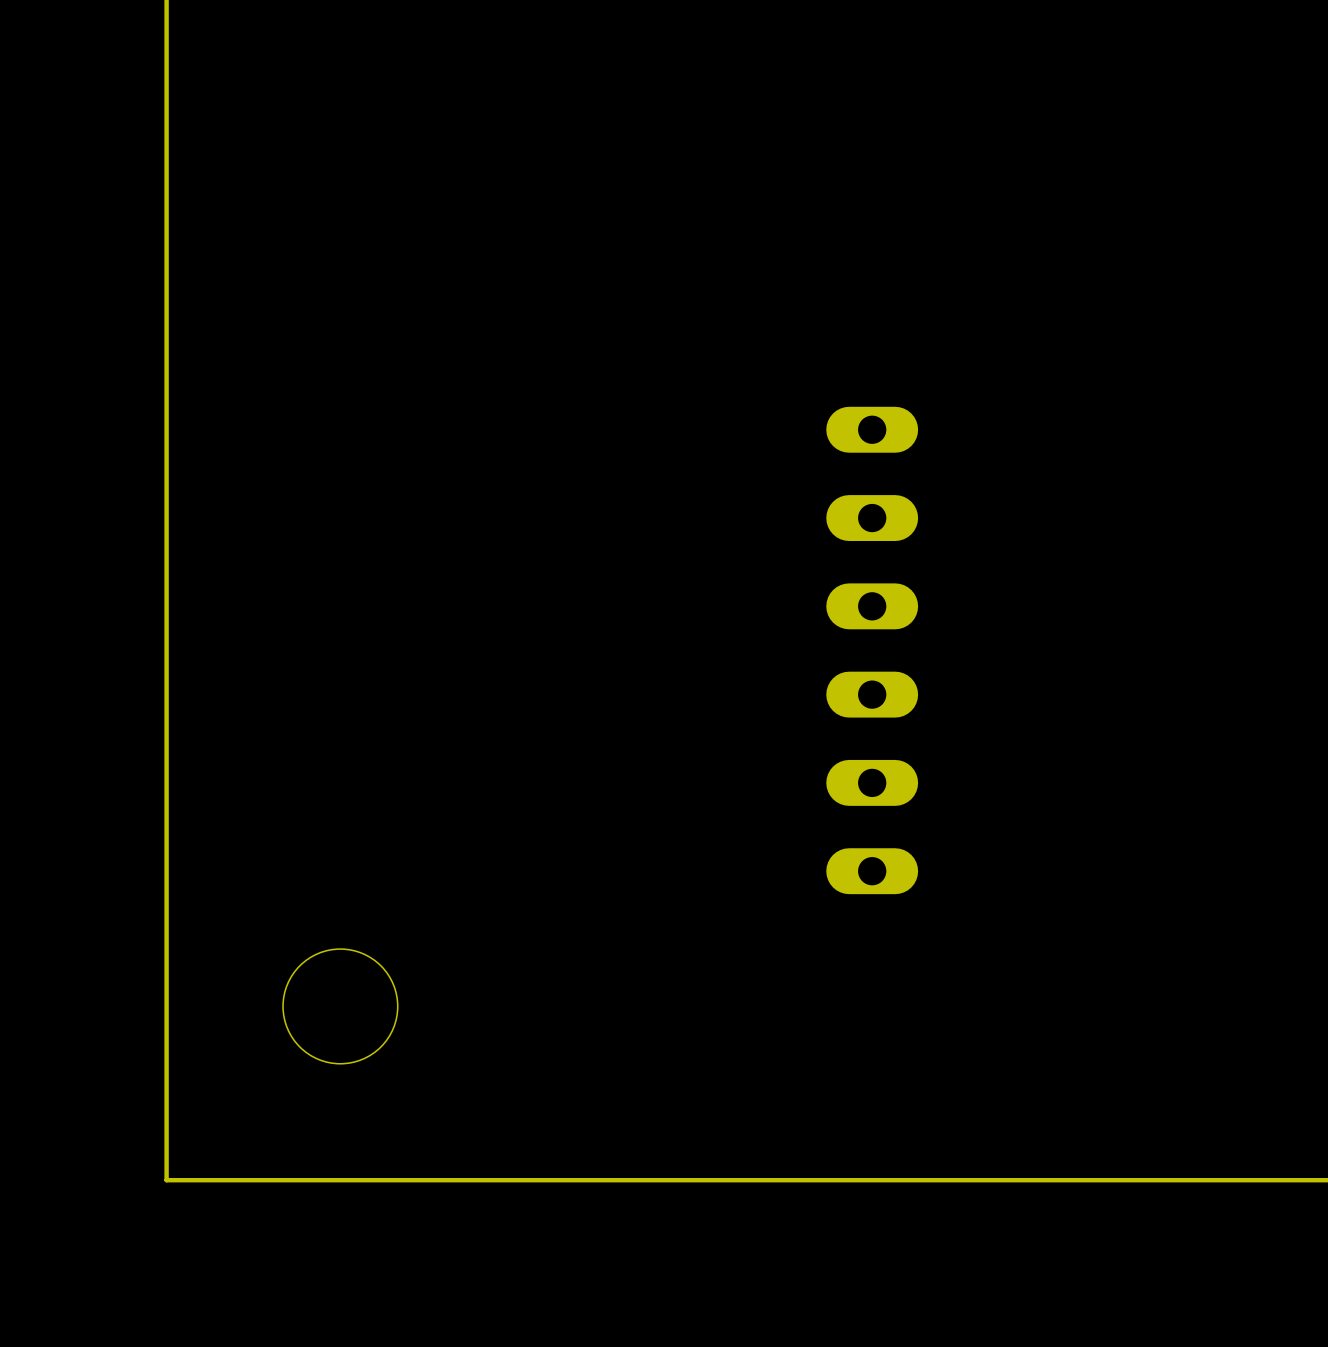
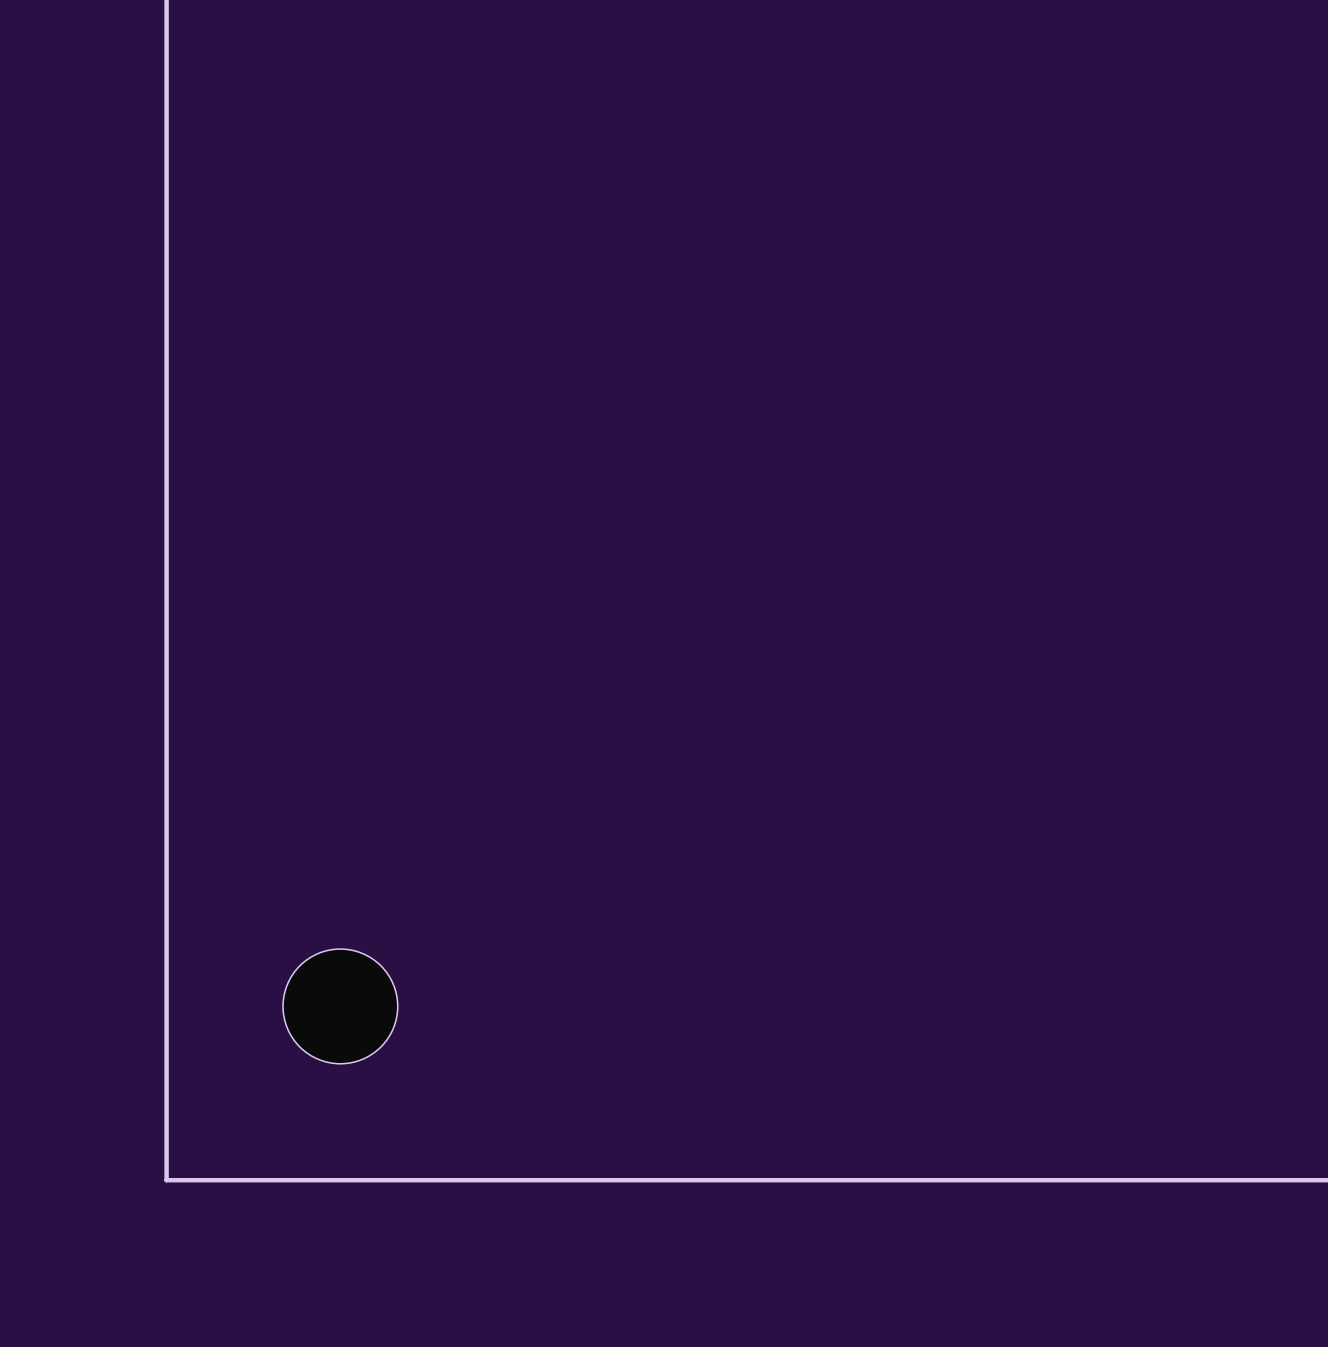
part: (872, 650) -> none

